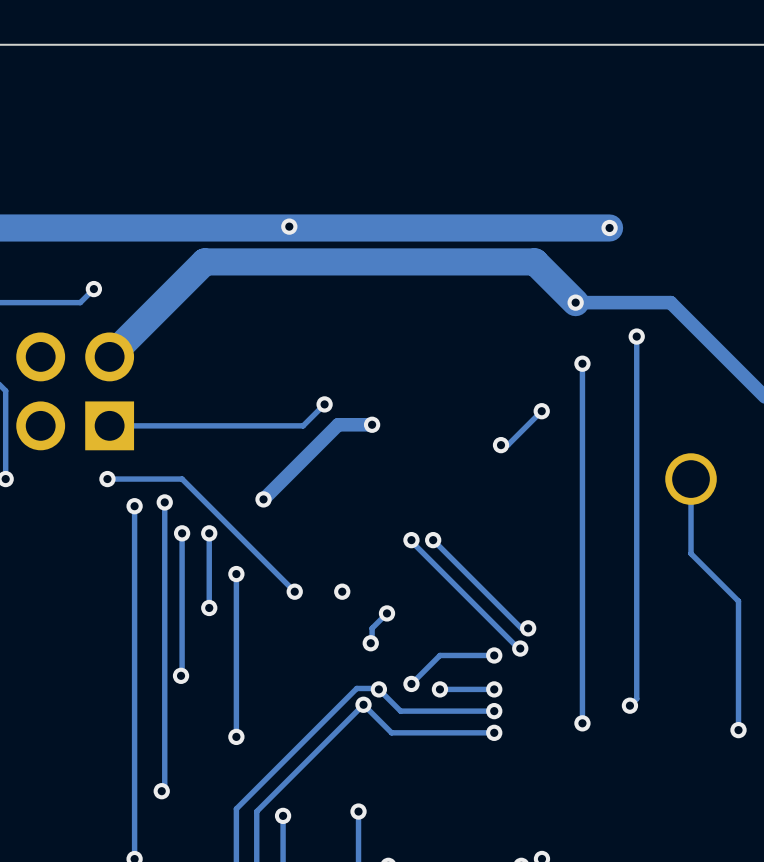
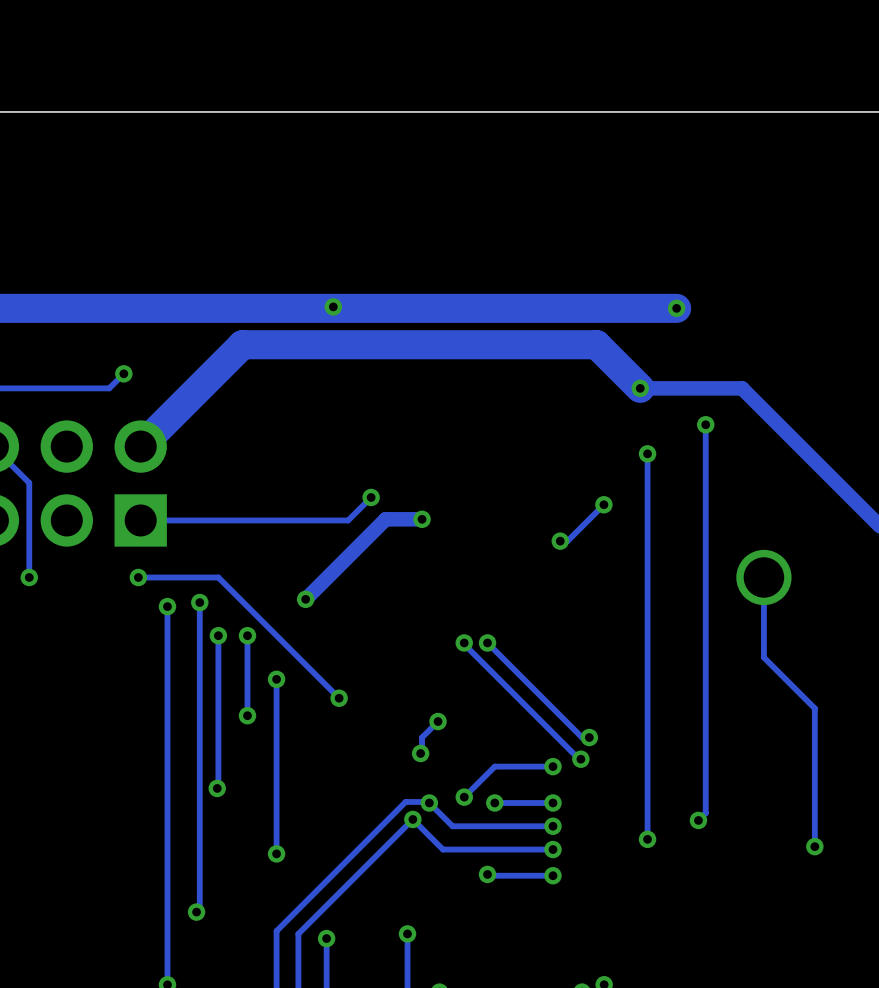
via: (342, 591) -> none
track: none -> (487, 874) (552, 875)
via: none -> (487, 874)
via: none -> (552, 875)

